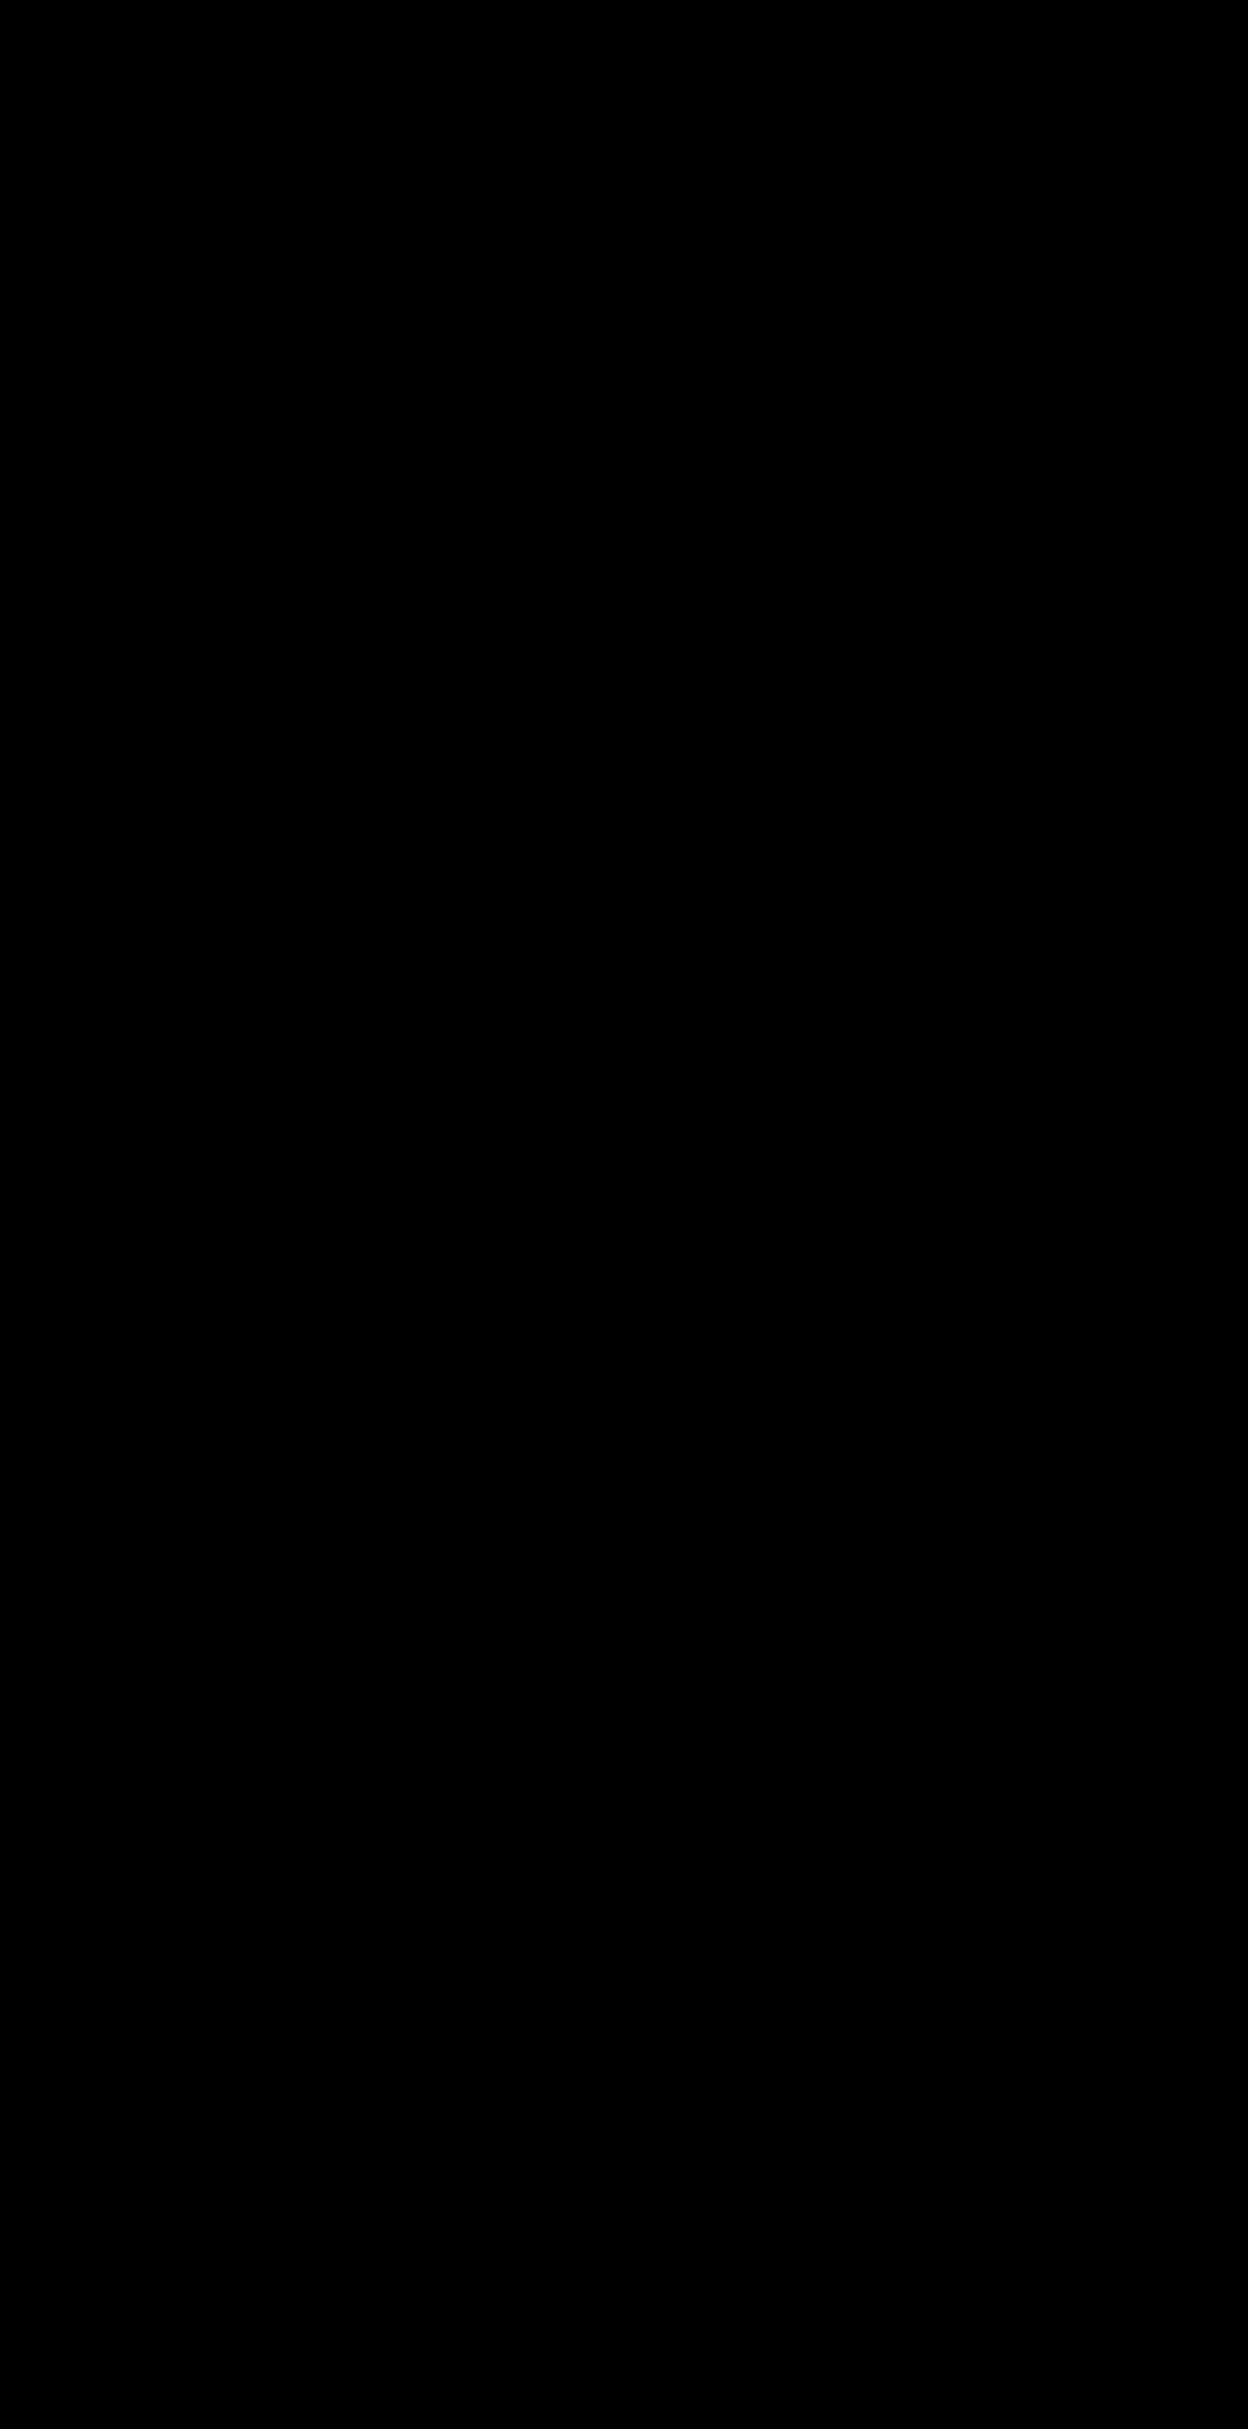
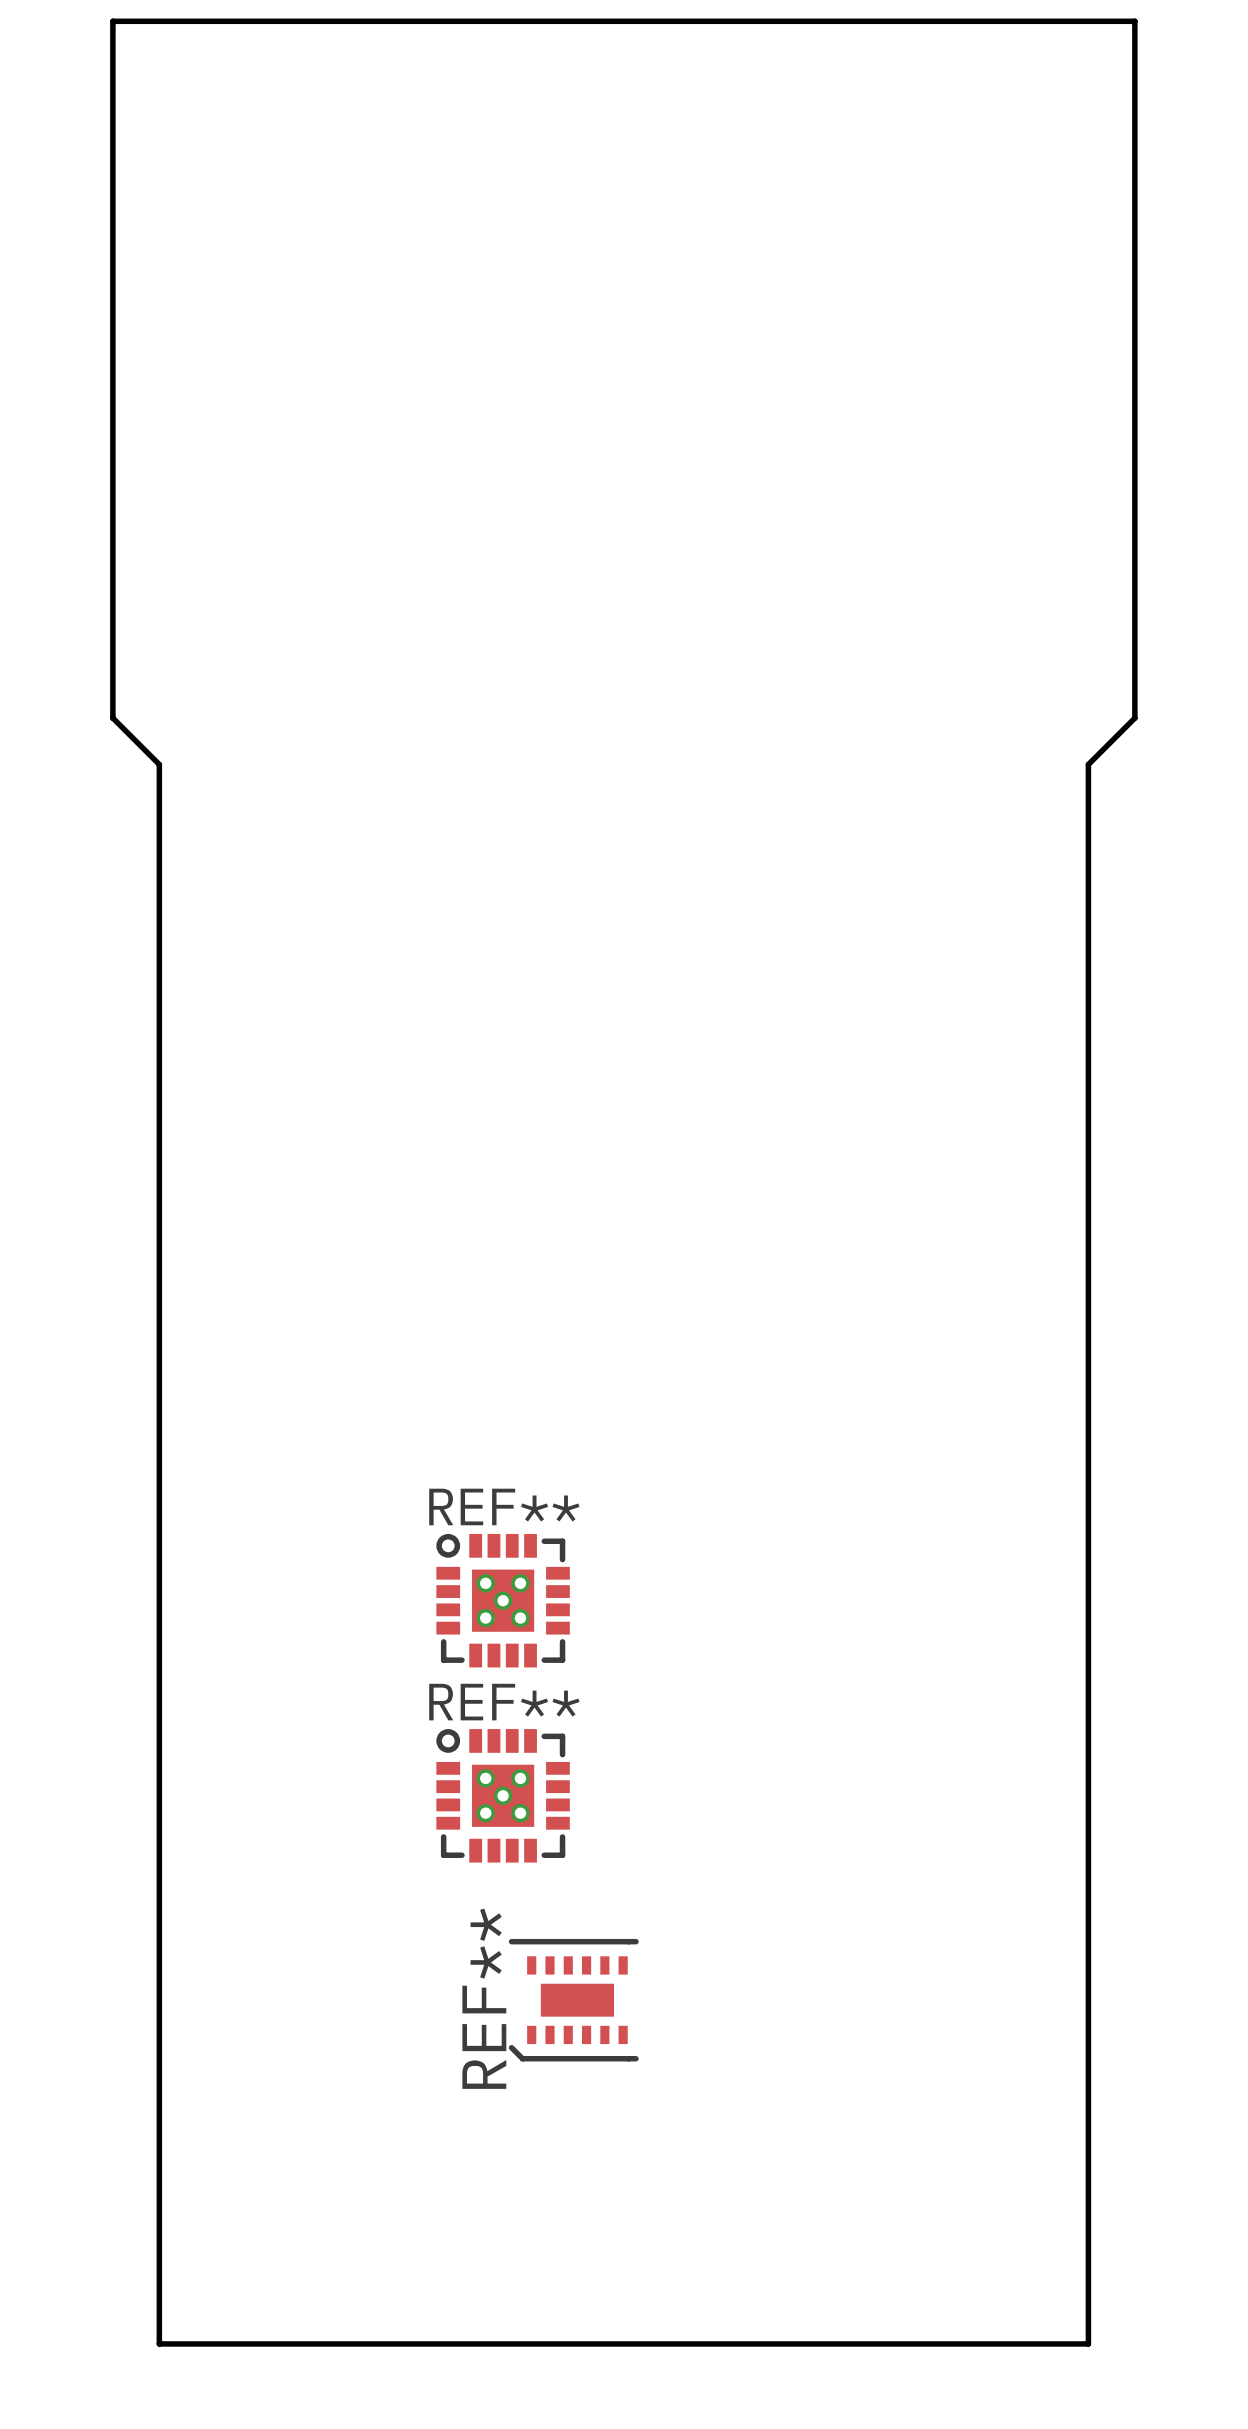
board edge: none -> (112, 21) (112, 718) (159, 764) (159, 2343) (1088, 2343) (1088, 764) (1134, 718) (1134, 21) (112, 21)
REF**: none -> (503, 1600)
REF**: none -> (503, 1795)
REF**: none -> (573, 2000)

